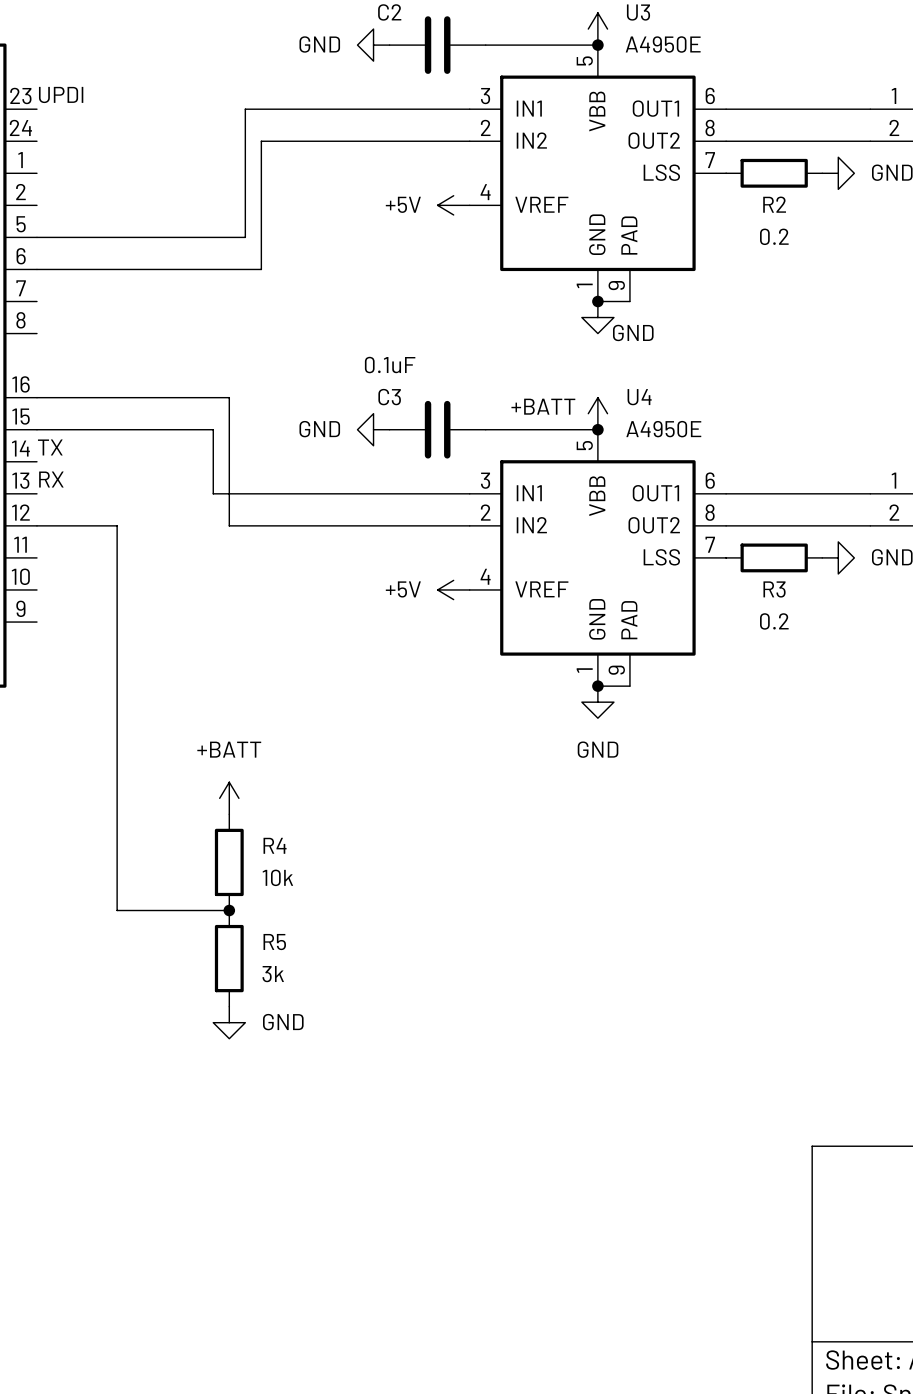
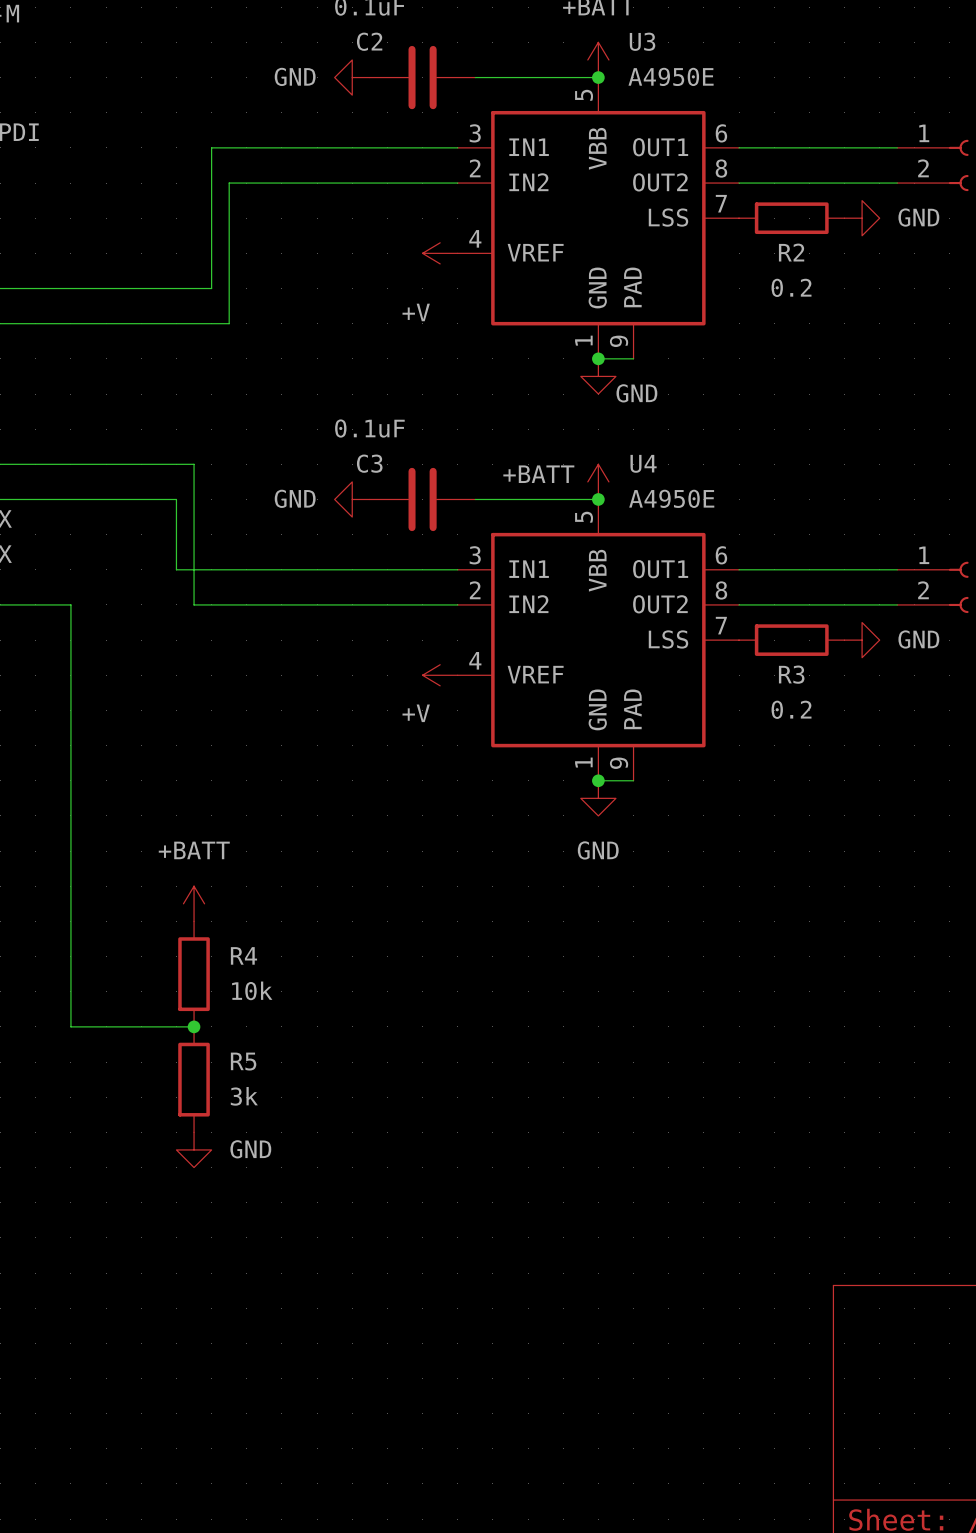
power symbol: +5V (453, 205) -> +V (440, 253)
power symbol: +5V (453, 589) -> +V (440, 675)

